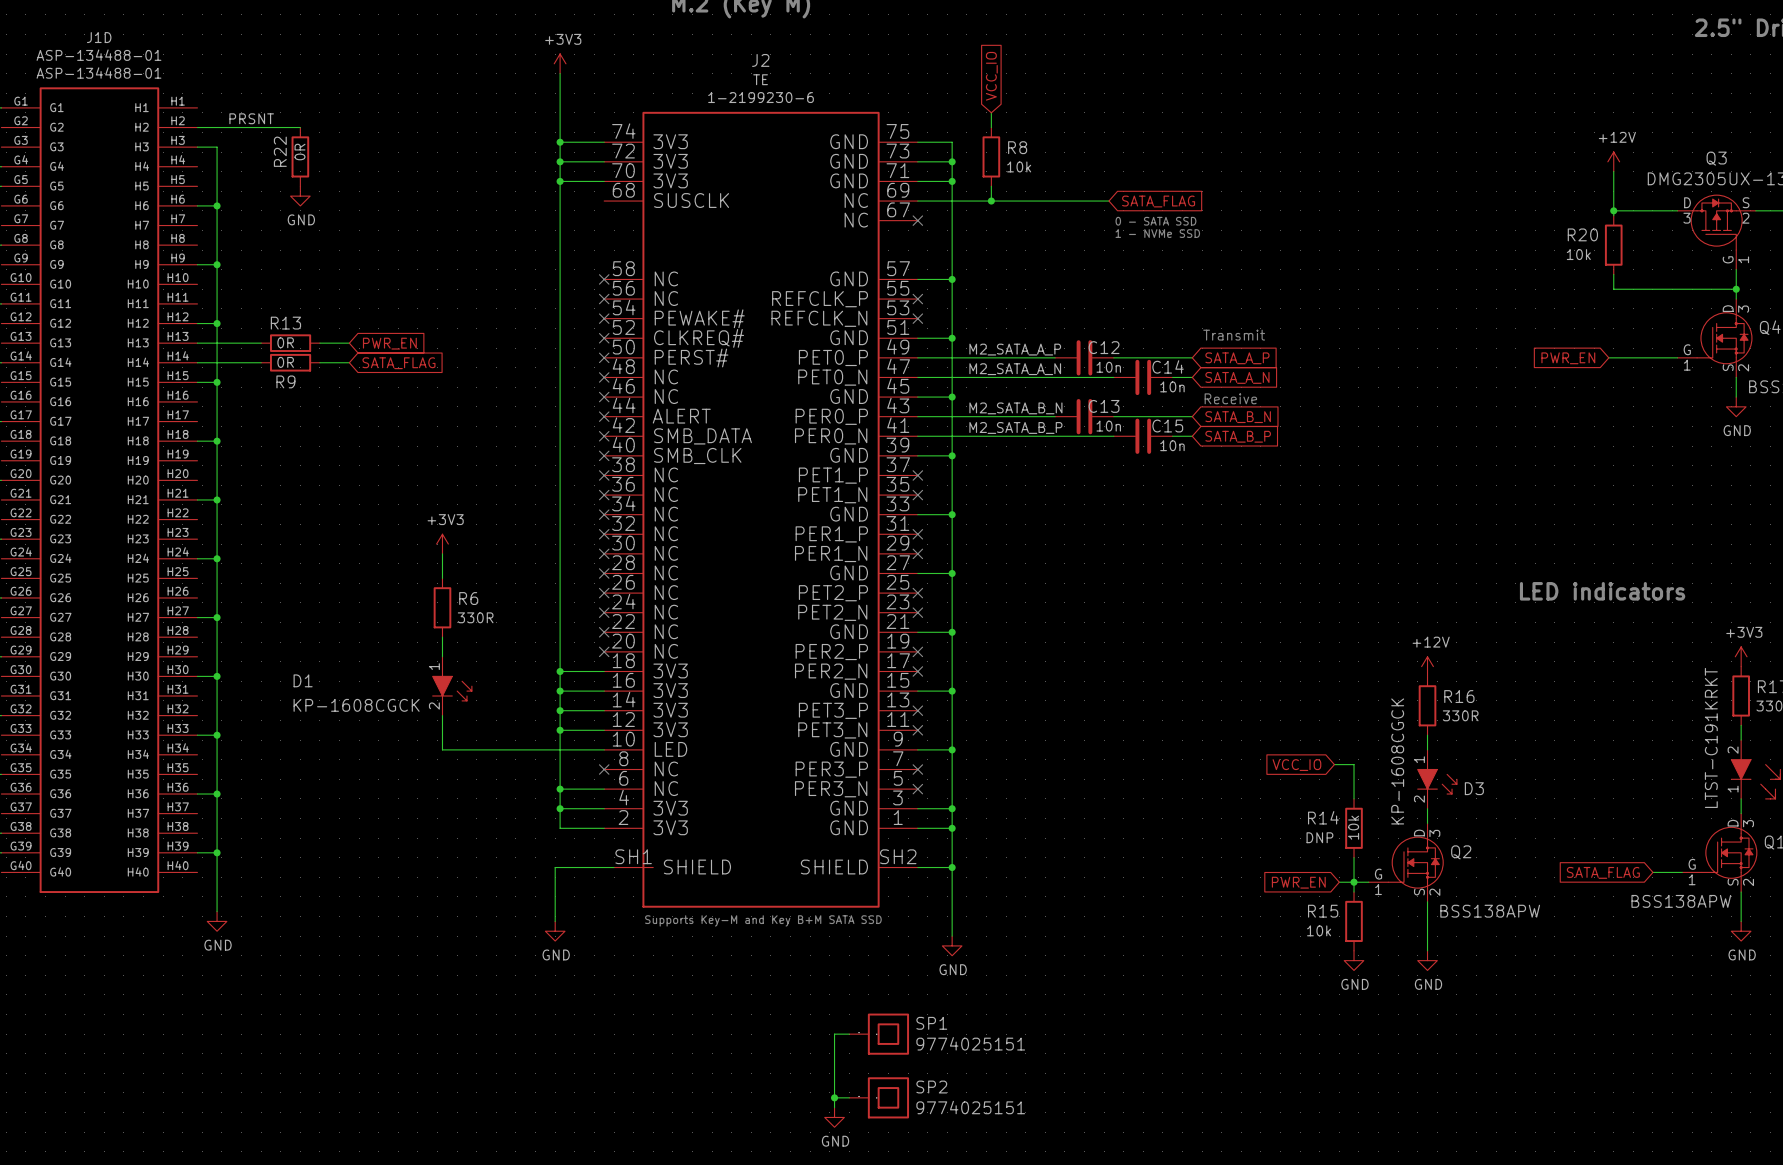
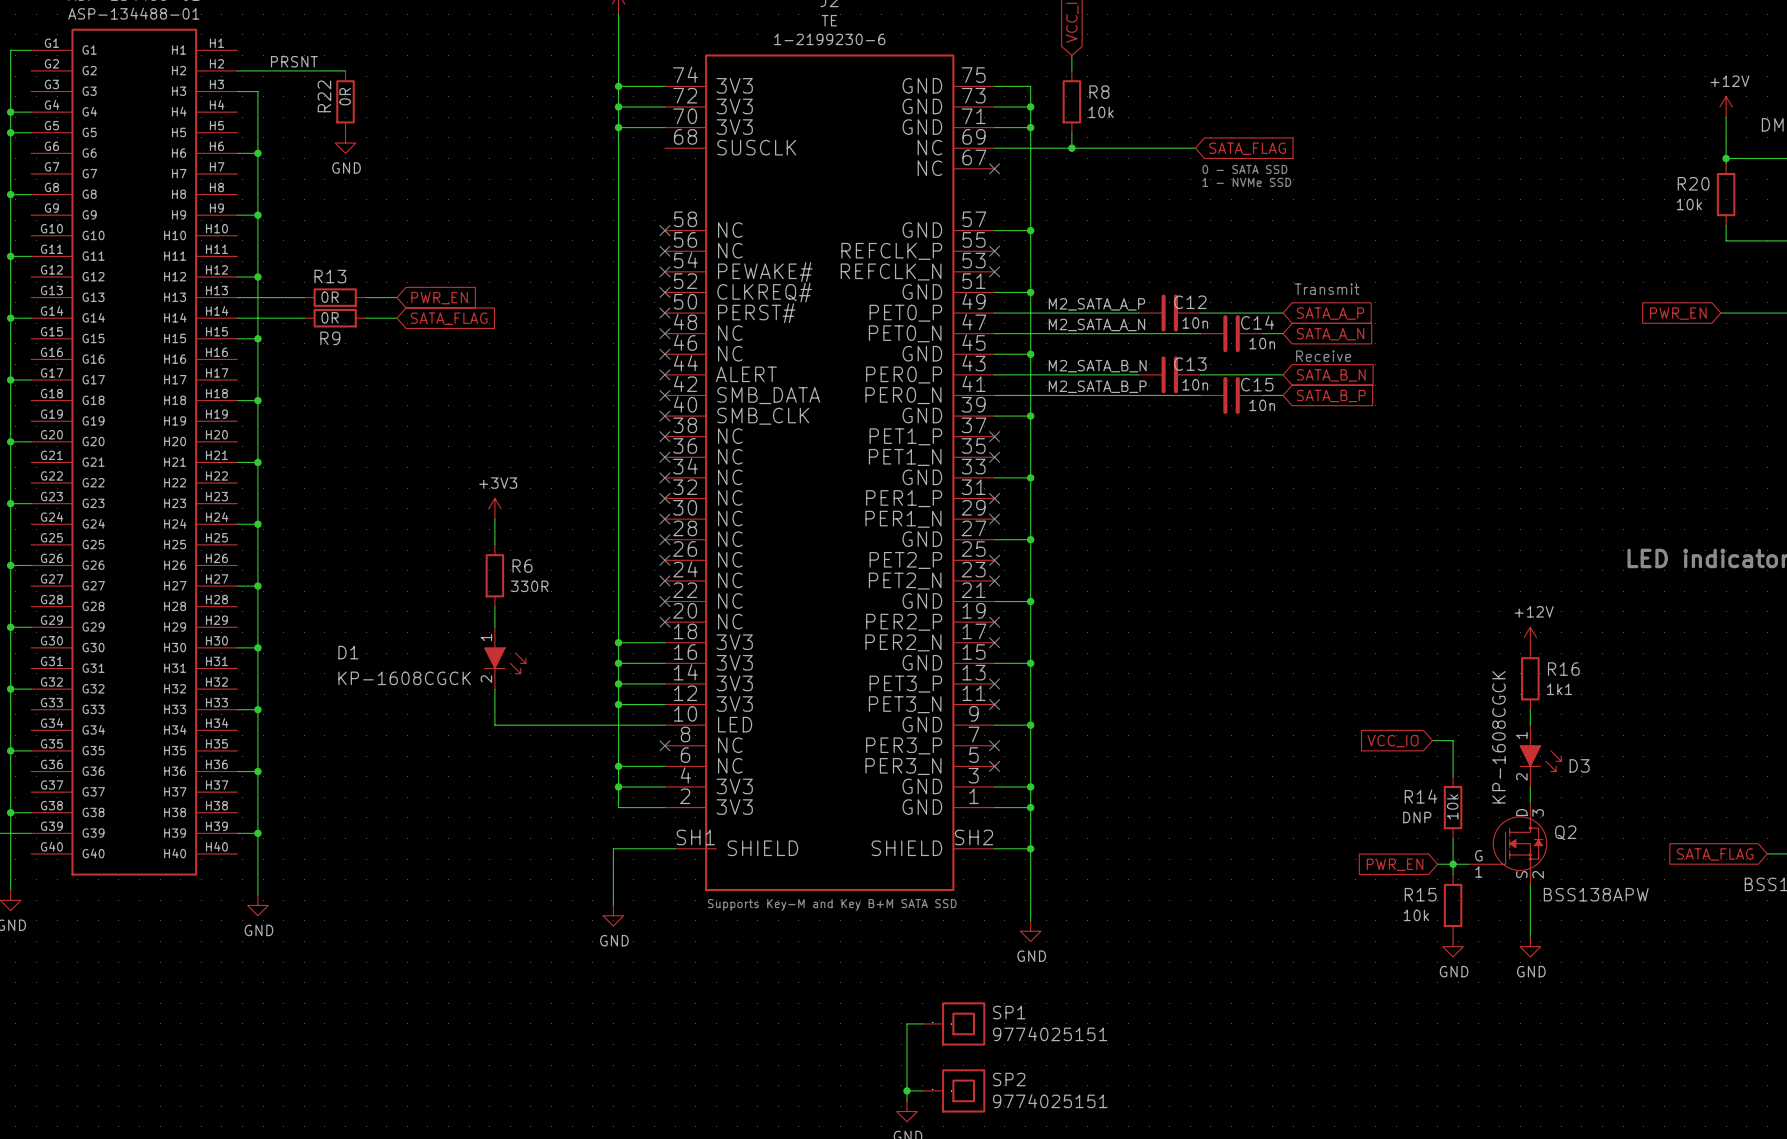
R16 text: 330R (1460, 715) -> 1k1 (1559, 689)

